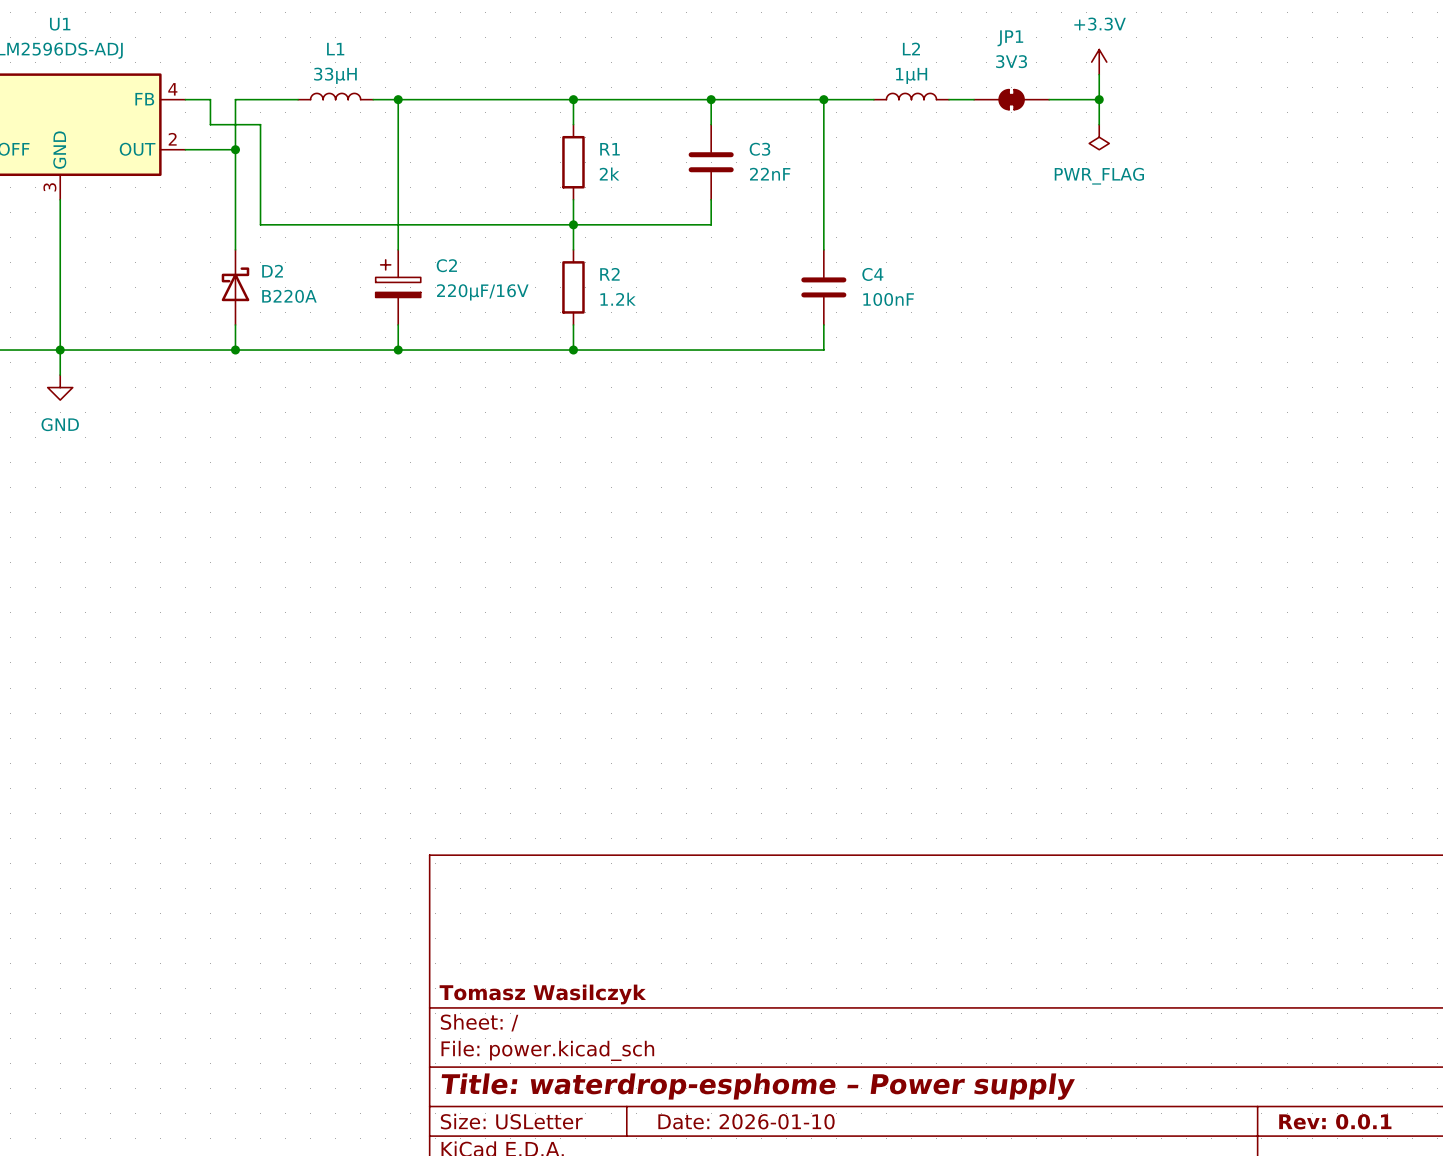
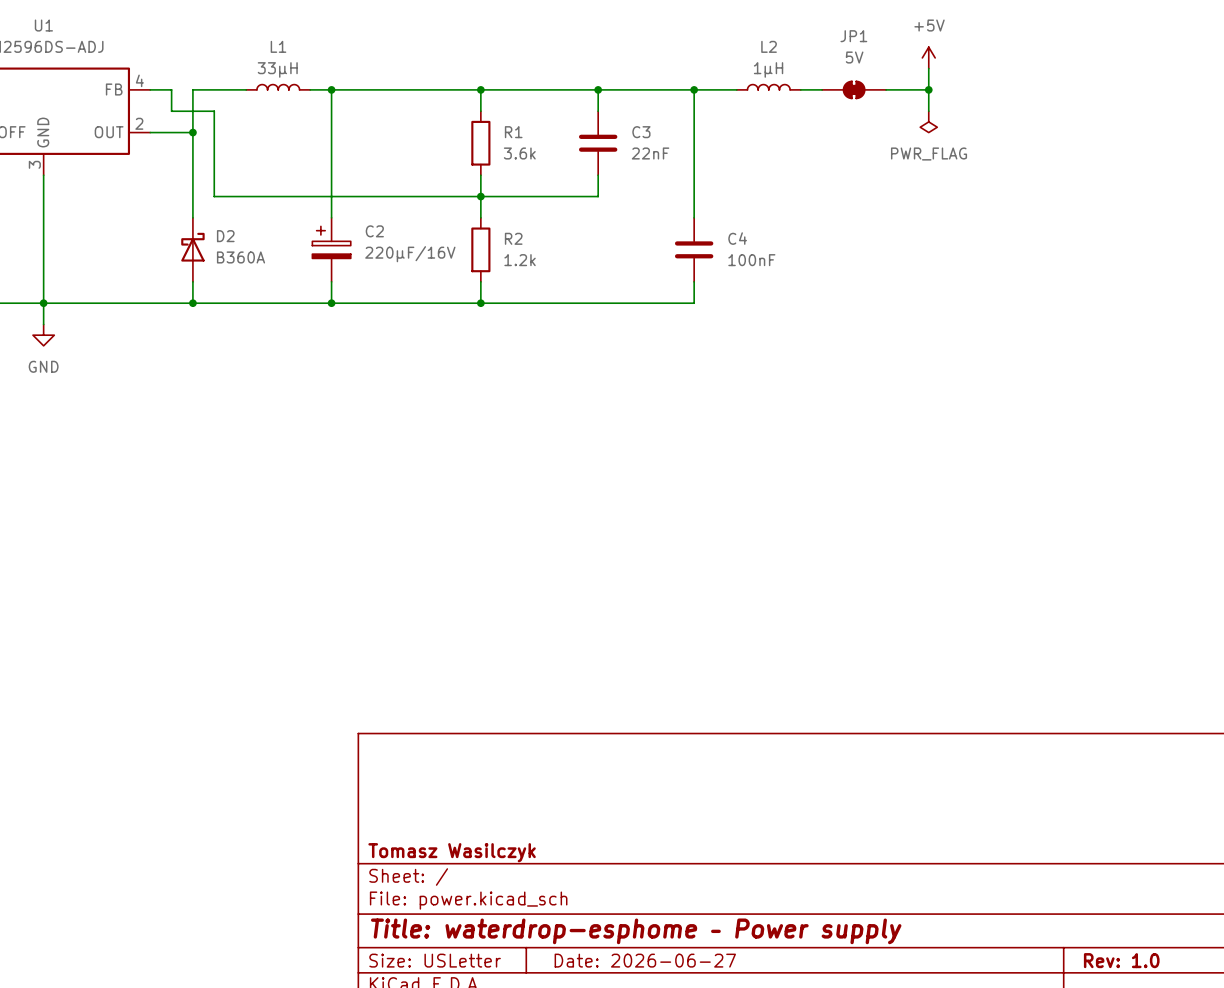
JP1 value: 3V3 (1011, 61) -> 5V (854, 57)
power symbol: +3.3V (1099, 62) -> +5V (928, 57)
R1 value: 2k (609, 174) -> 3.6k (519, 153)
D2 value: B220A (289, 296) -> B360A (241, 257)
title block: Date: 2026-01-10 (746, 1121) -> Date: 2026-06-27 (645, 960)
title block: Rev: 0.0.1 (1335, 1121) -> Rev: 1.0 (1121, 960)

